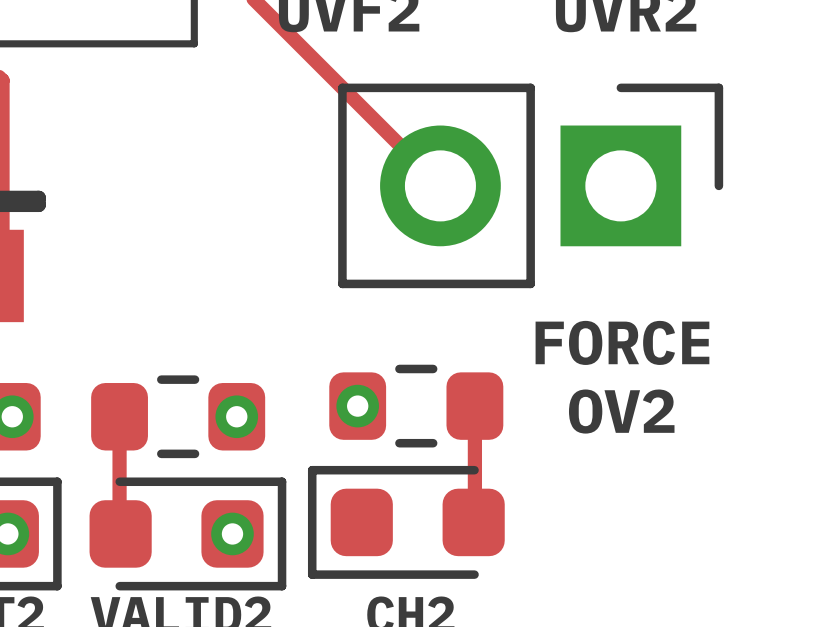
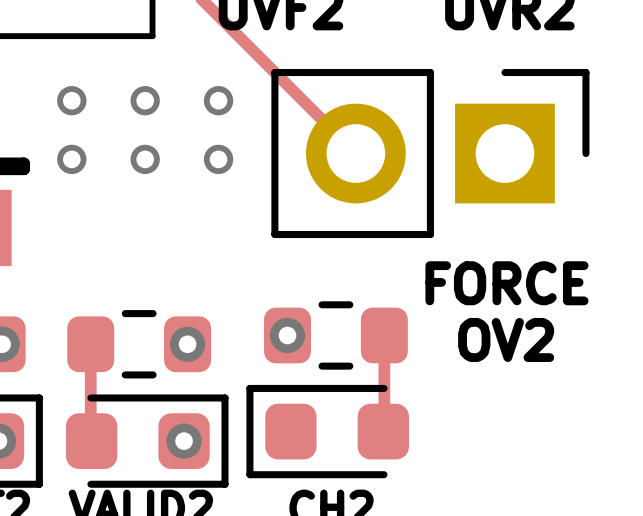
via: none -> (71, 100)
via: none -> (145, 100)
via: none -> (218, 100)
via: none -> (71, 159)
via: none -> (145, 159)
via: none -> (218, 159)

